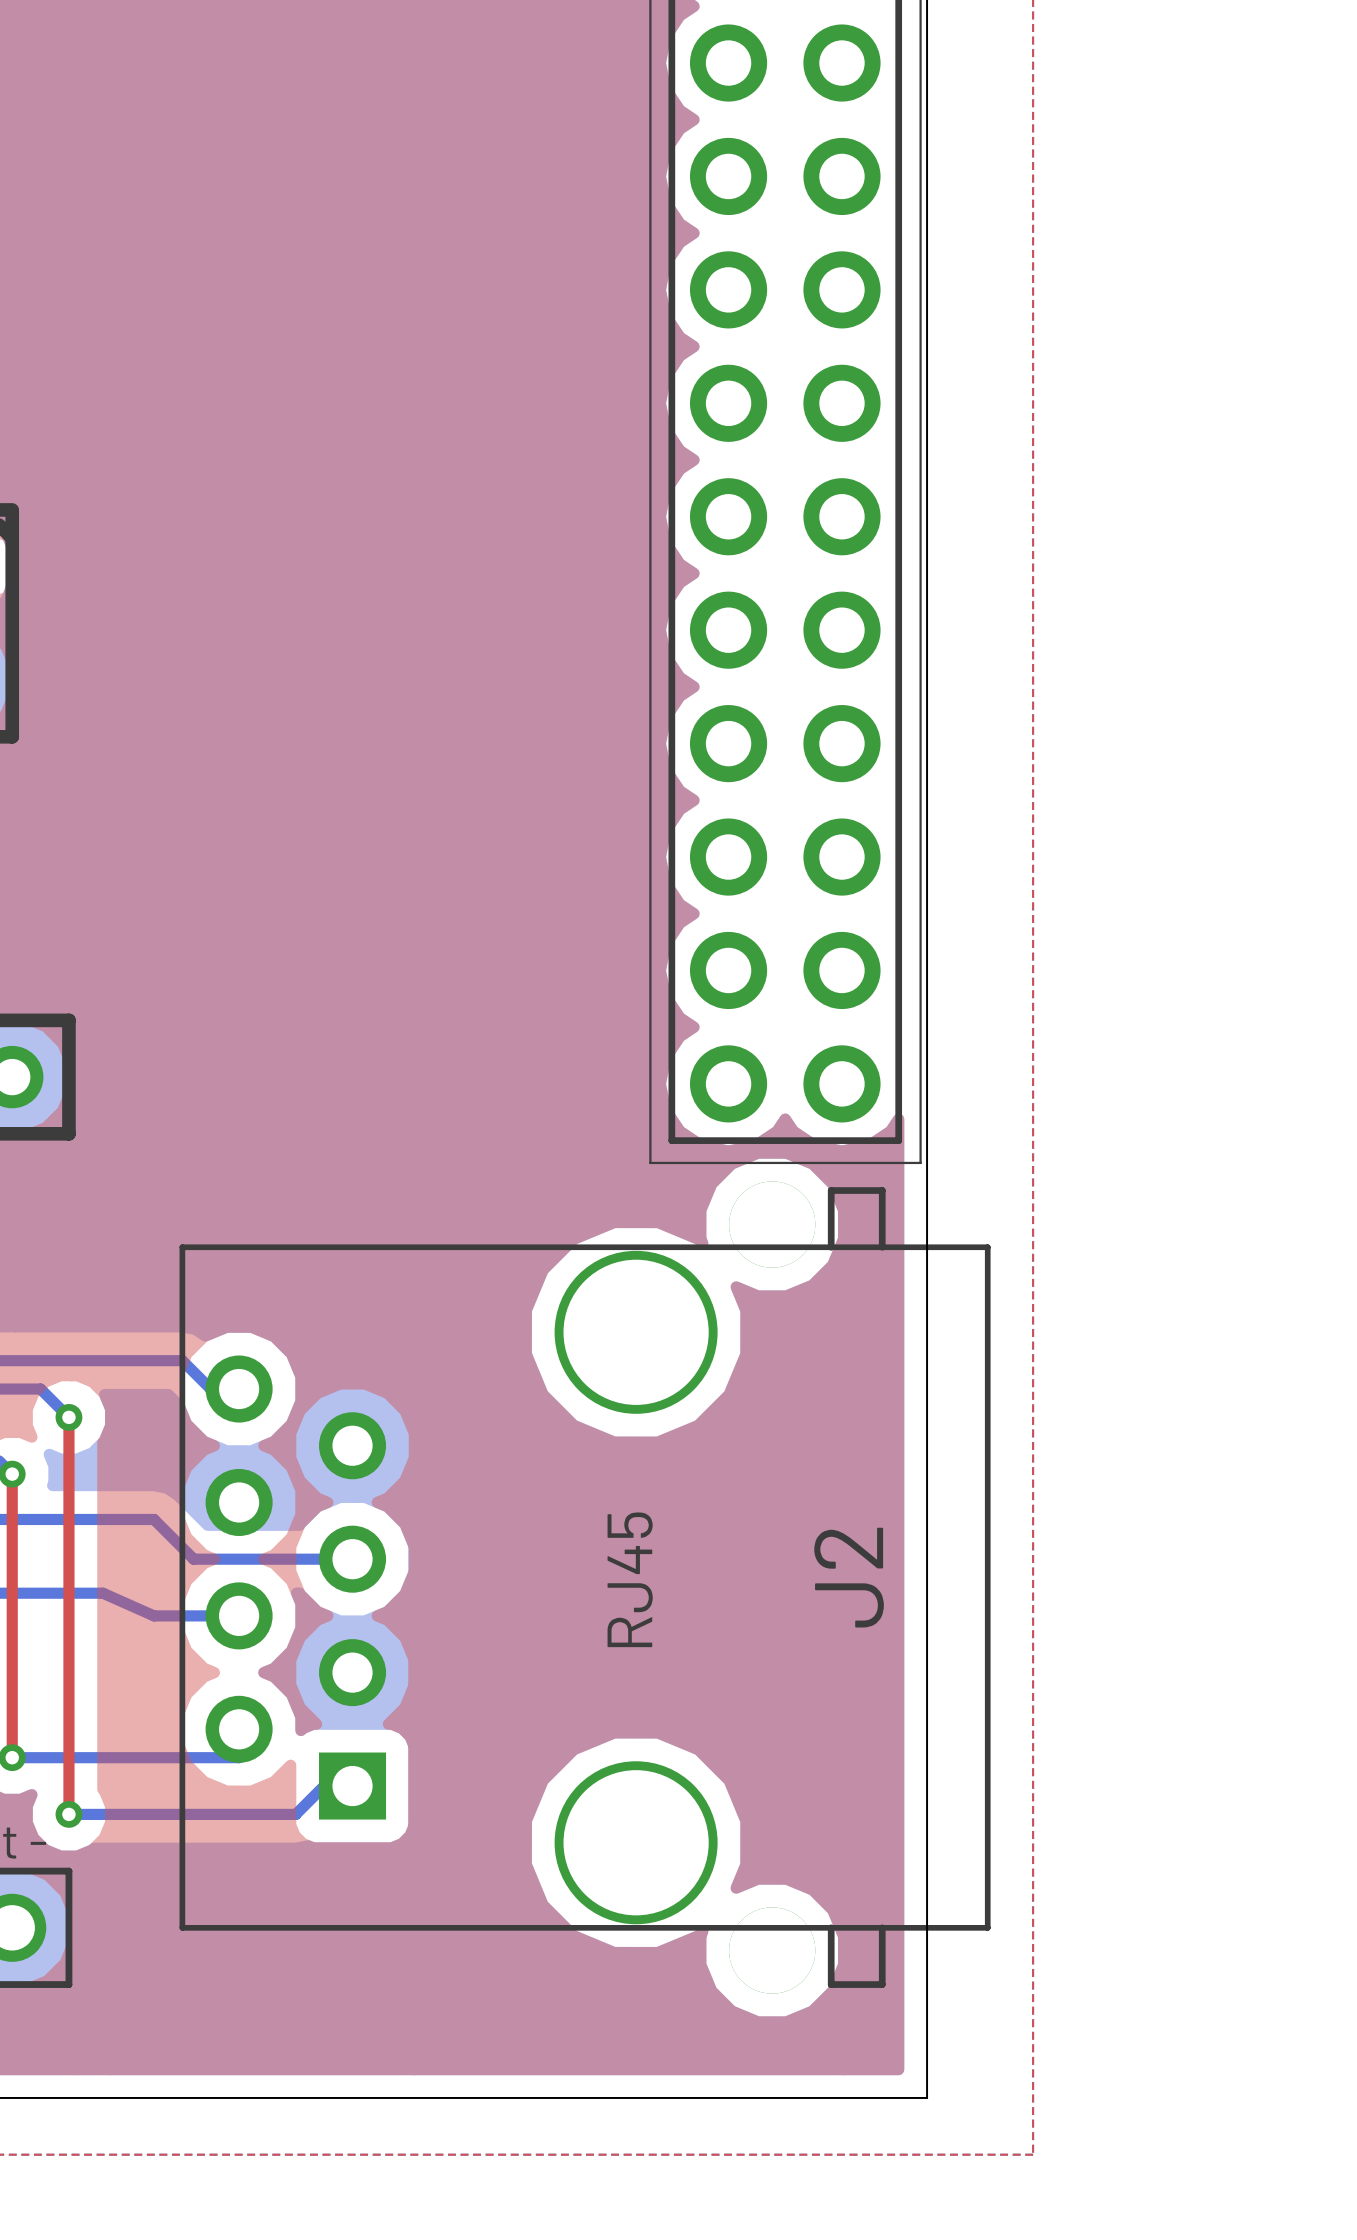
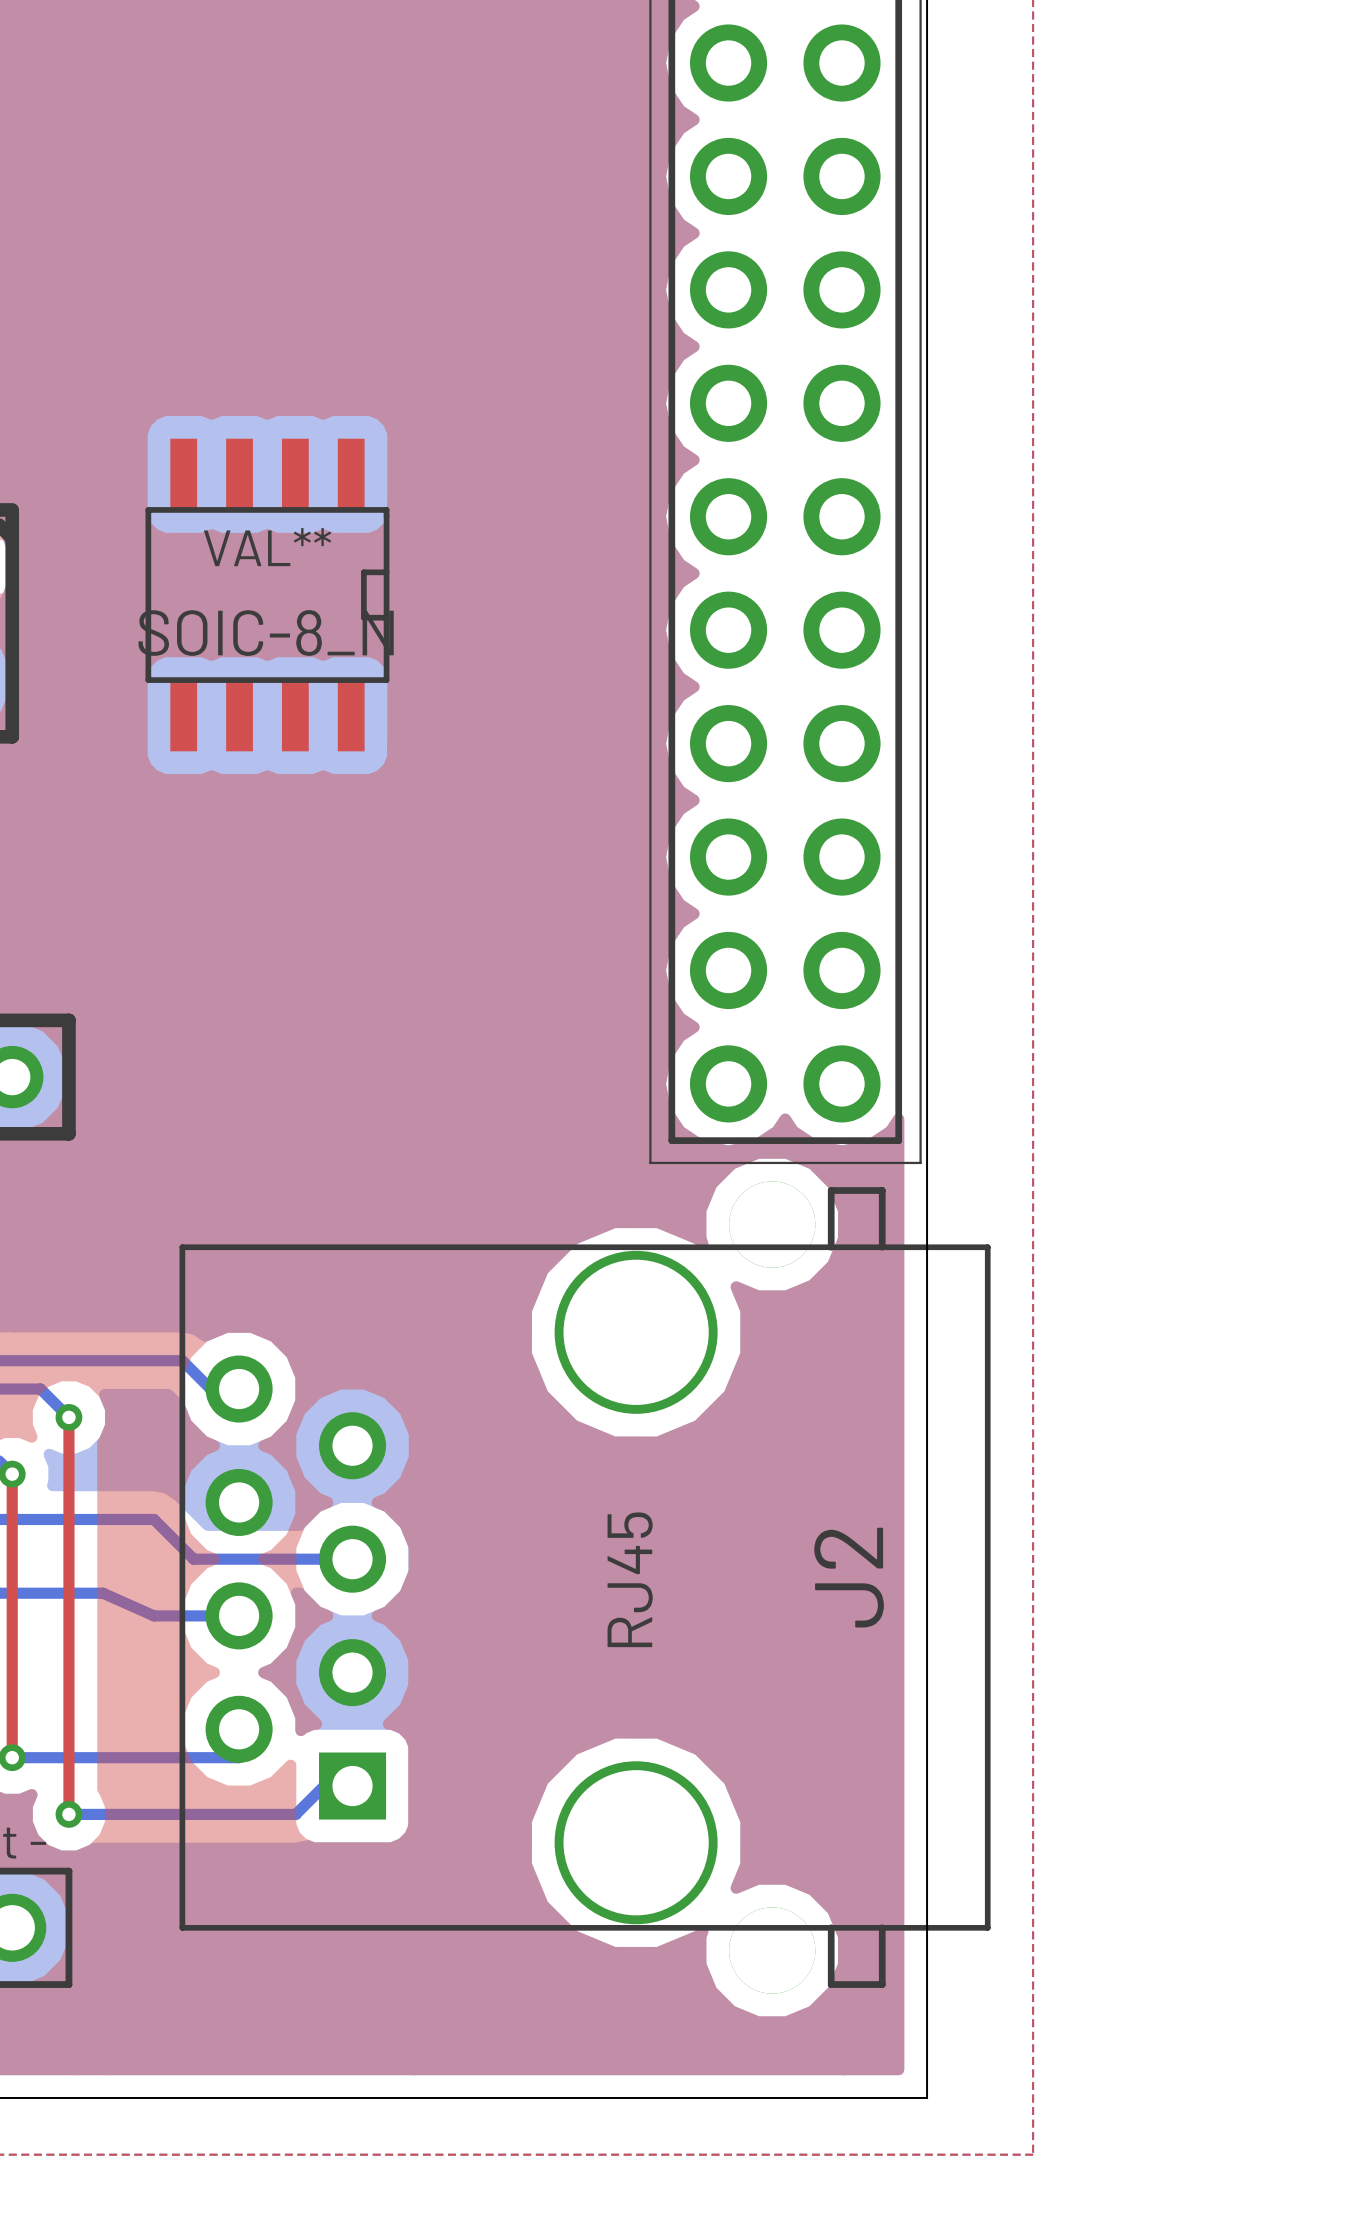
SOIC-8_N: none -> VAL** (267, 595)

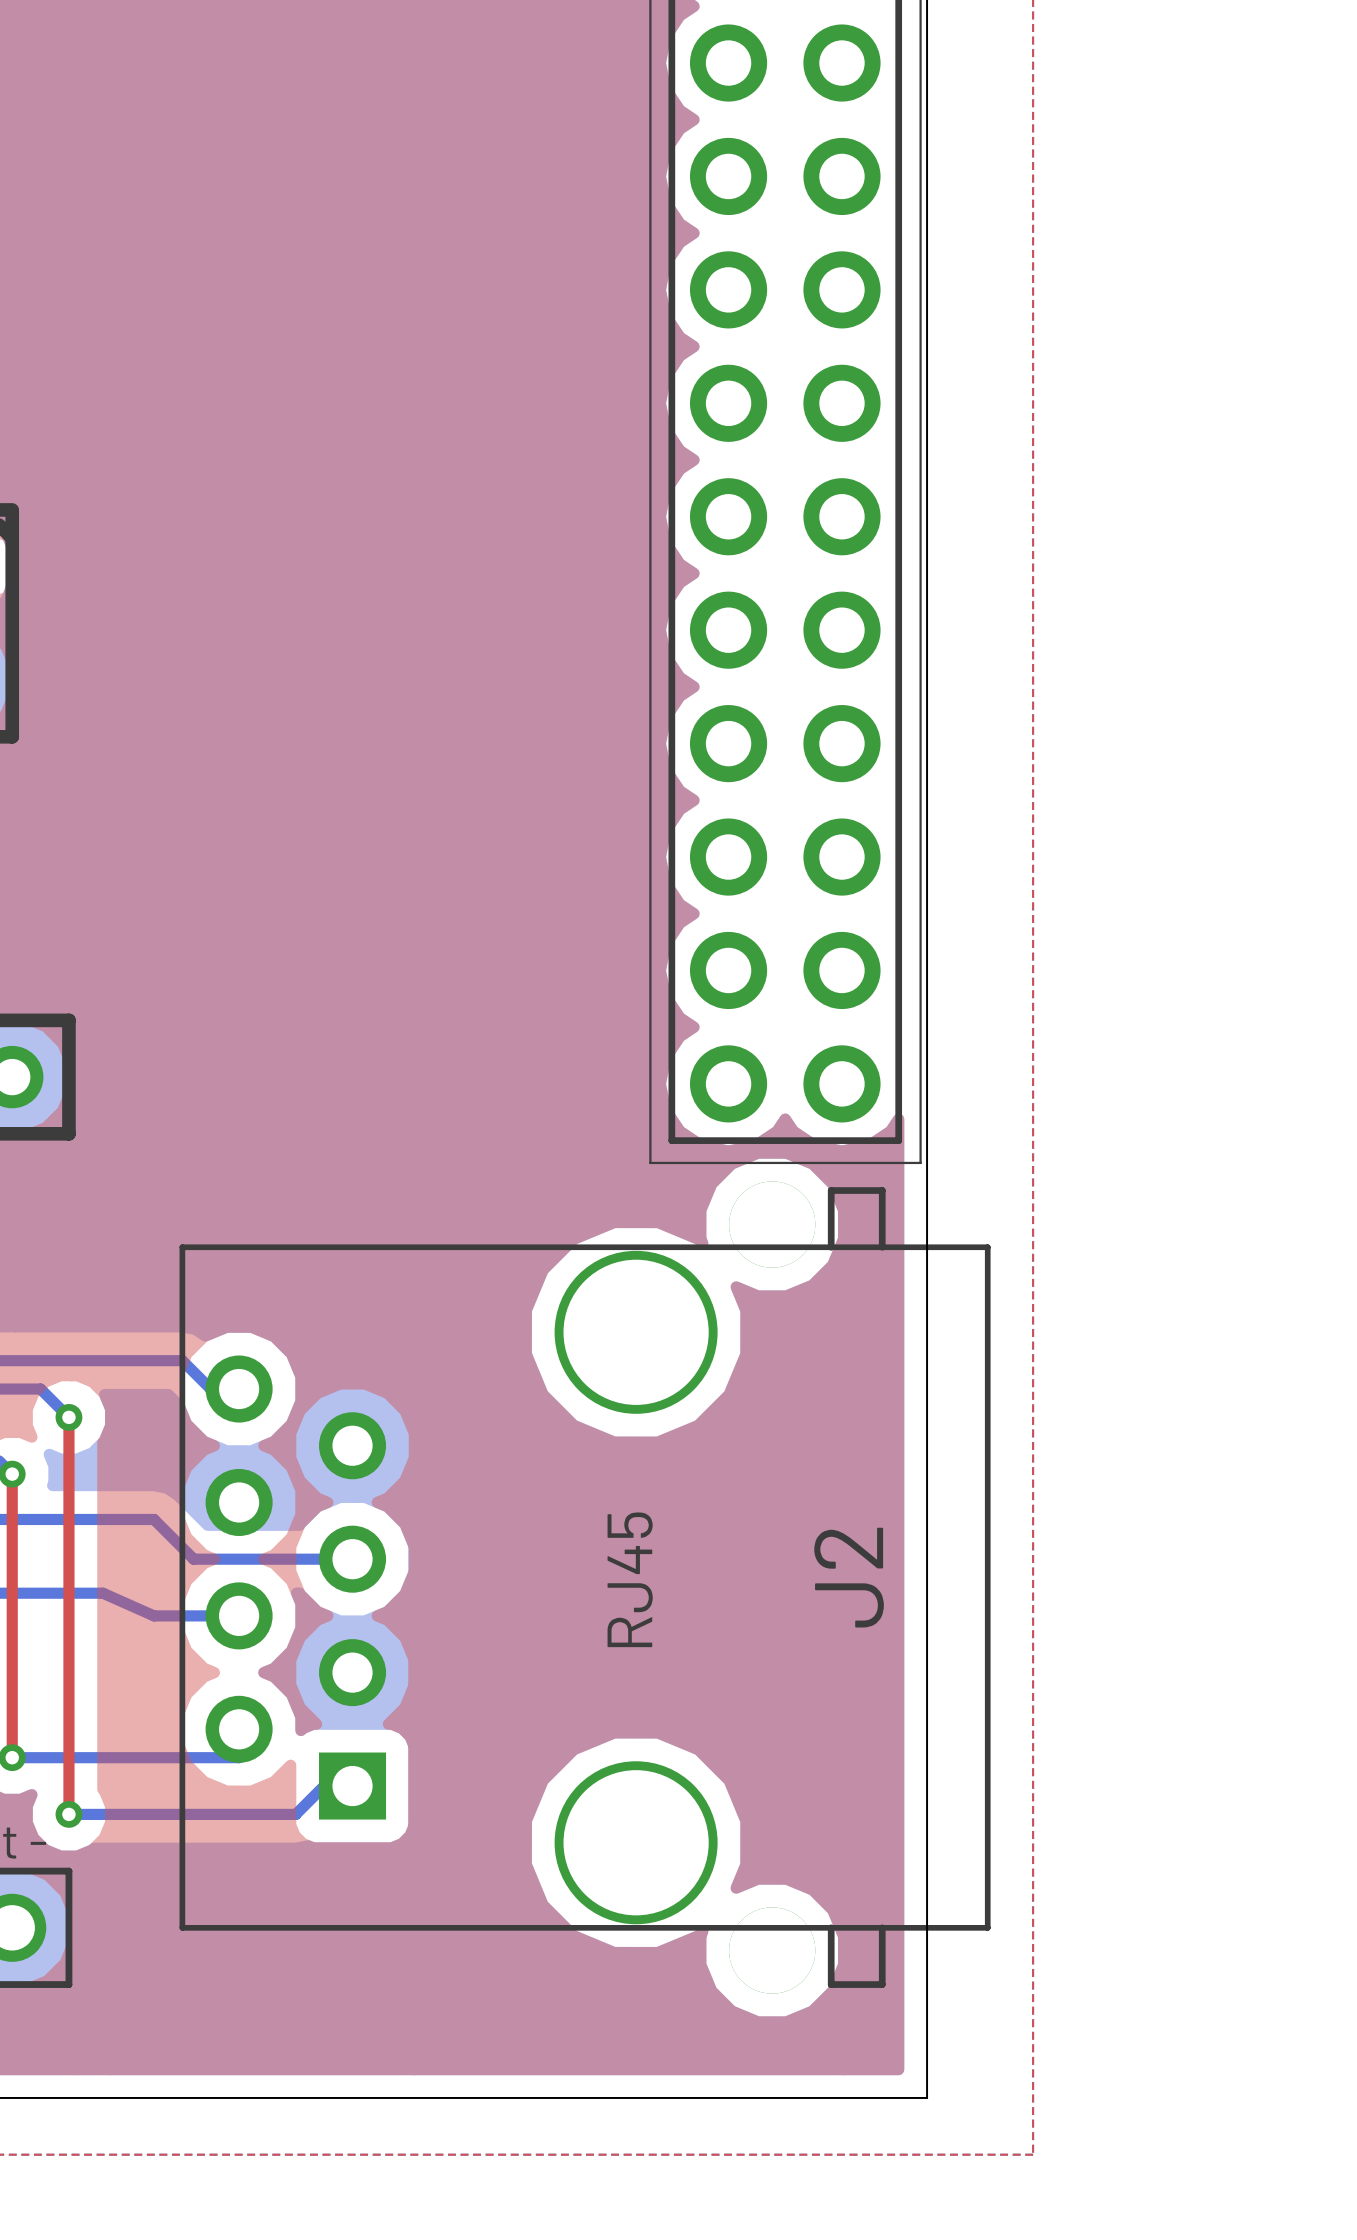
SOIC-8_N: VAL** (267, 595) -> none

